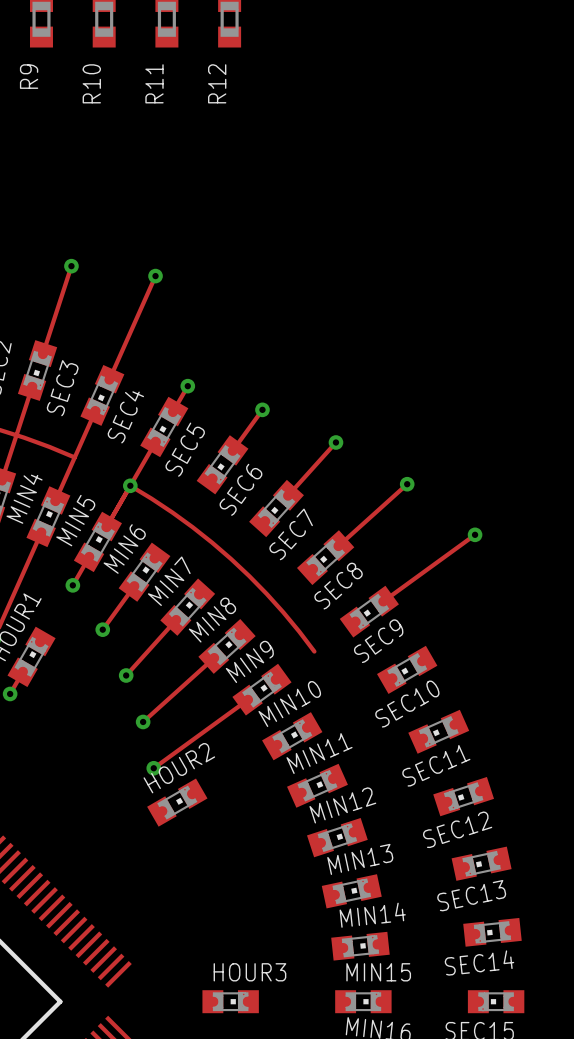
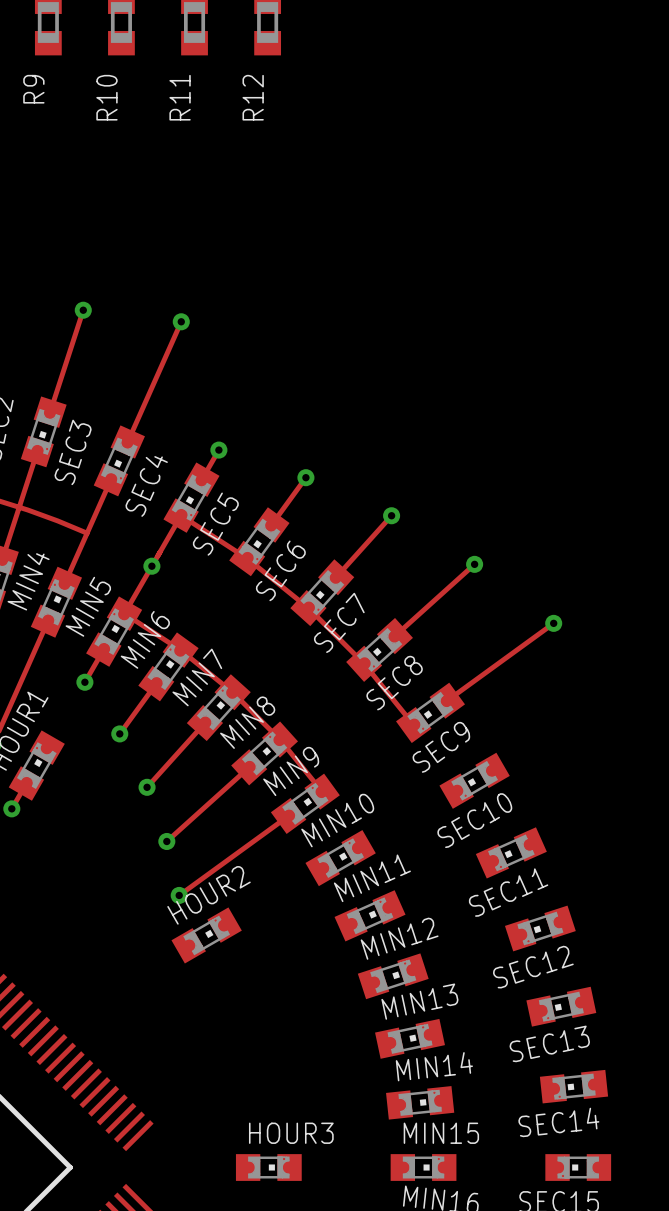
track: none -> (181, 515) (247, 558) (308, 608) (364, 663) (413, 725)
track: (130, 485) (192, 527) (231, 559) (283, 612) (314, 651) -> none
track: none -> (124, 613) (180, 650) (232, 692) (279, 739) (322, 791)

